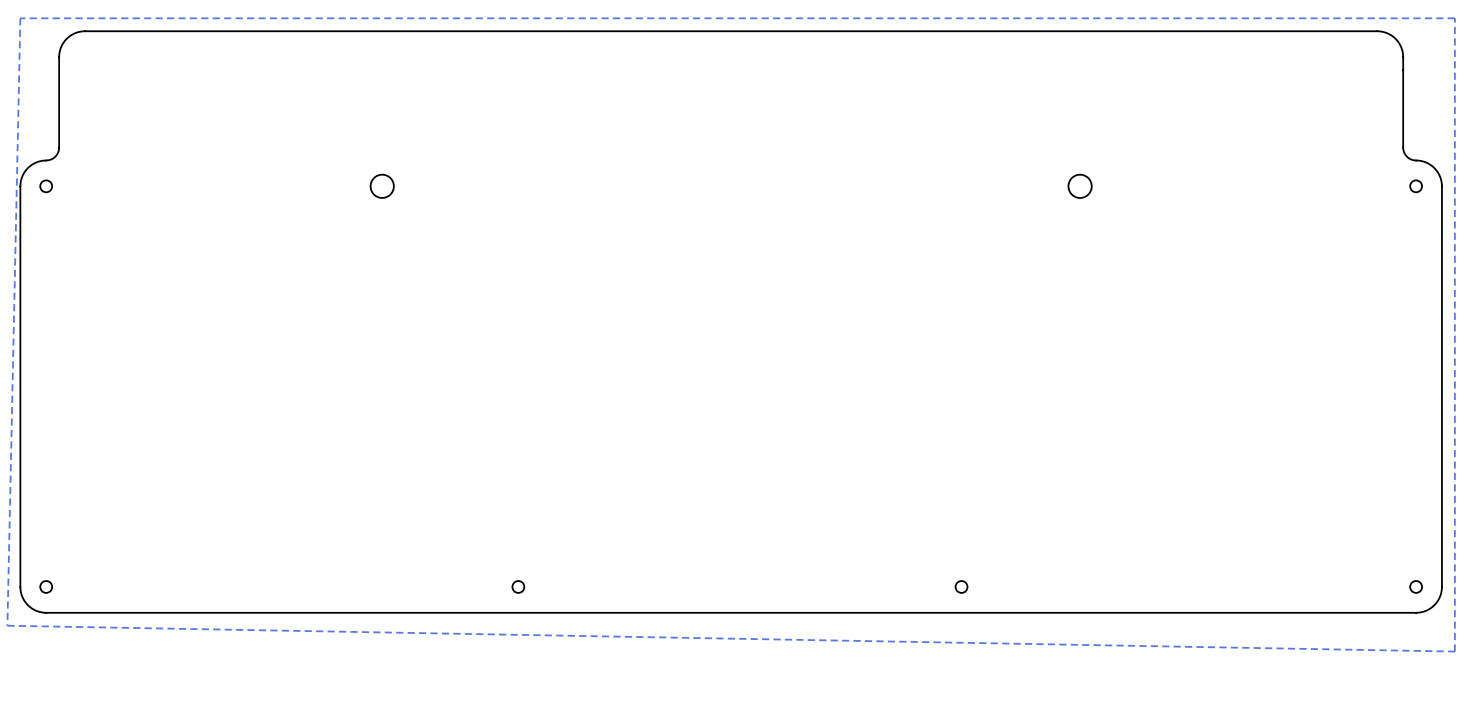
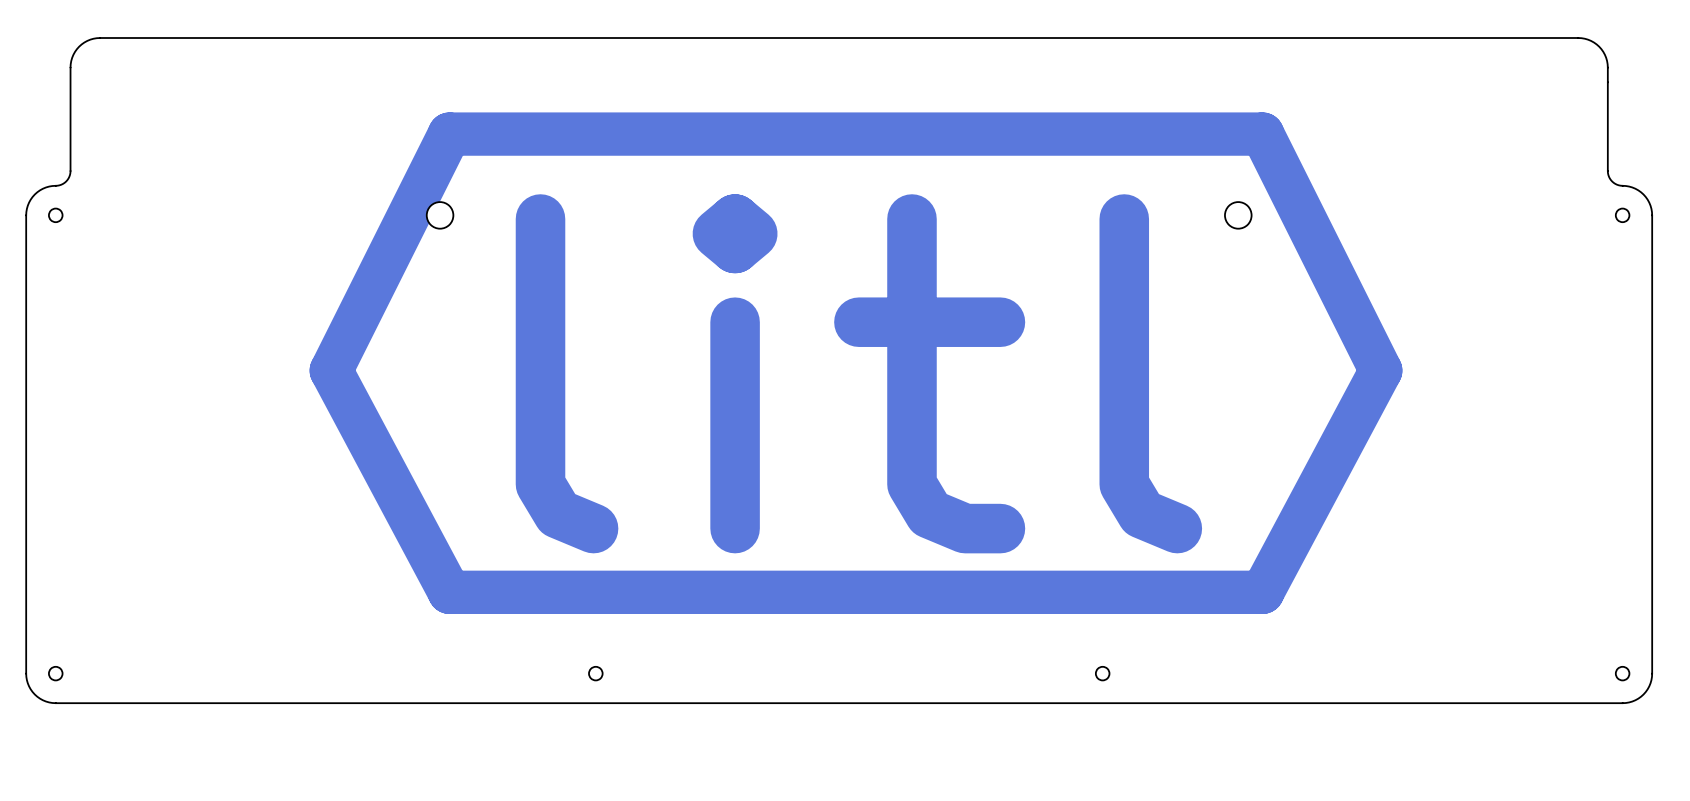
zone outline: (1454, 18) (1454, 651) (7, 625) (20, 18) (1454, 18) -> none
track: none -> (1262, 134) (449, 134) (331, 370) (449, 592) (1262, 592) (1380, 370) (1262, 134)
text: none -> litl (858, 373)

